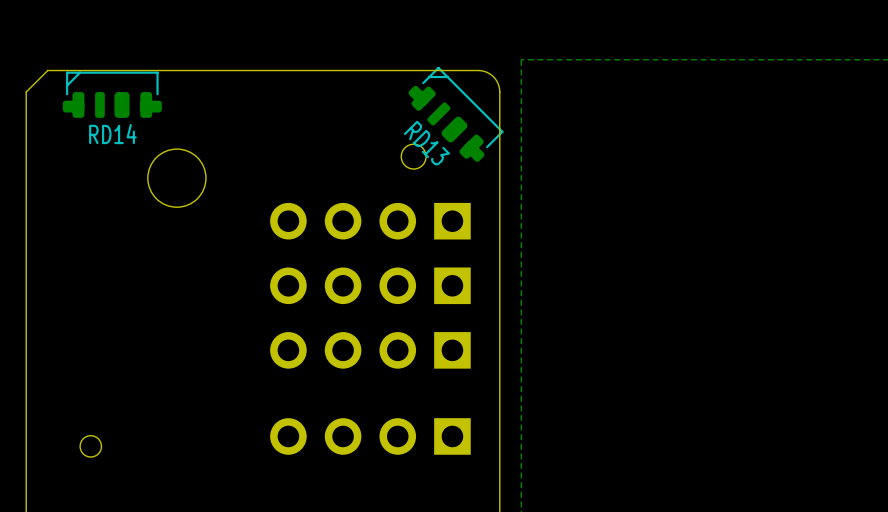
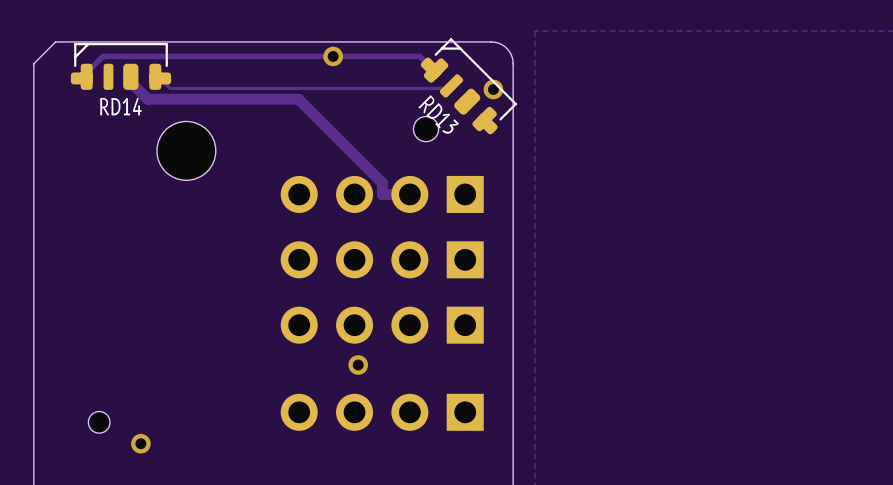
via: none -> (333, 56)
track: none -> (431, 68) (419, 56) (102, 56) (86, 72)
track: none -> (160, 78) (170, 88) (448, 88)
track: none -> (130, 82) (147, 99) (298, 99) (382, 183) (382, 194) (409, 194)
via: none -> (493, 89)
via: none -> (358, 365)
via: none -> (140, 443)

